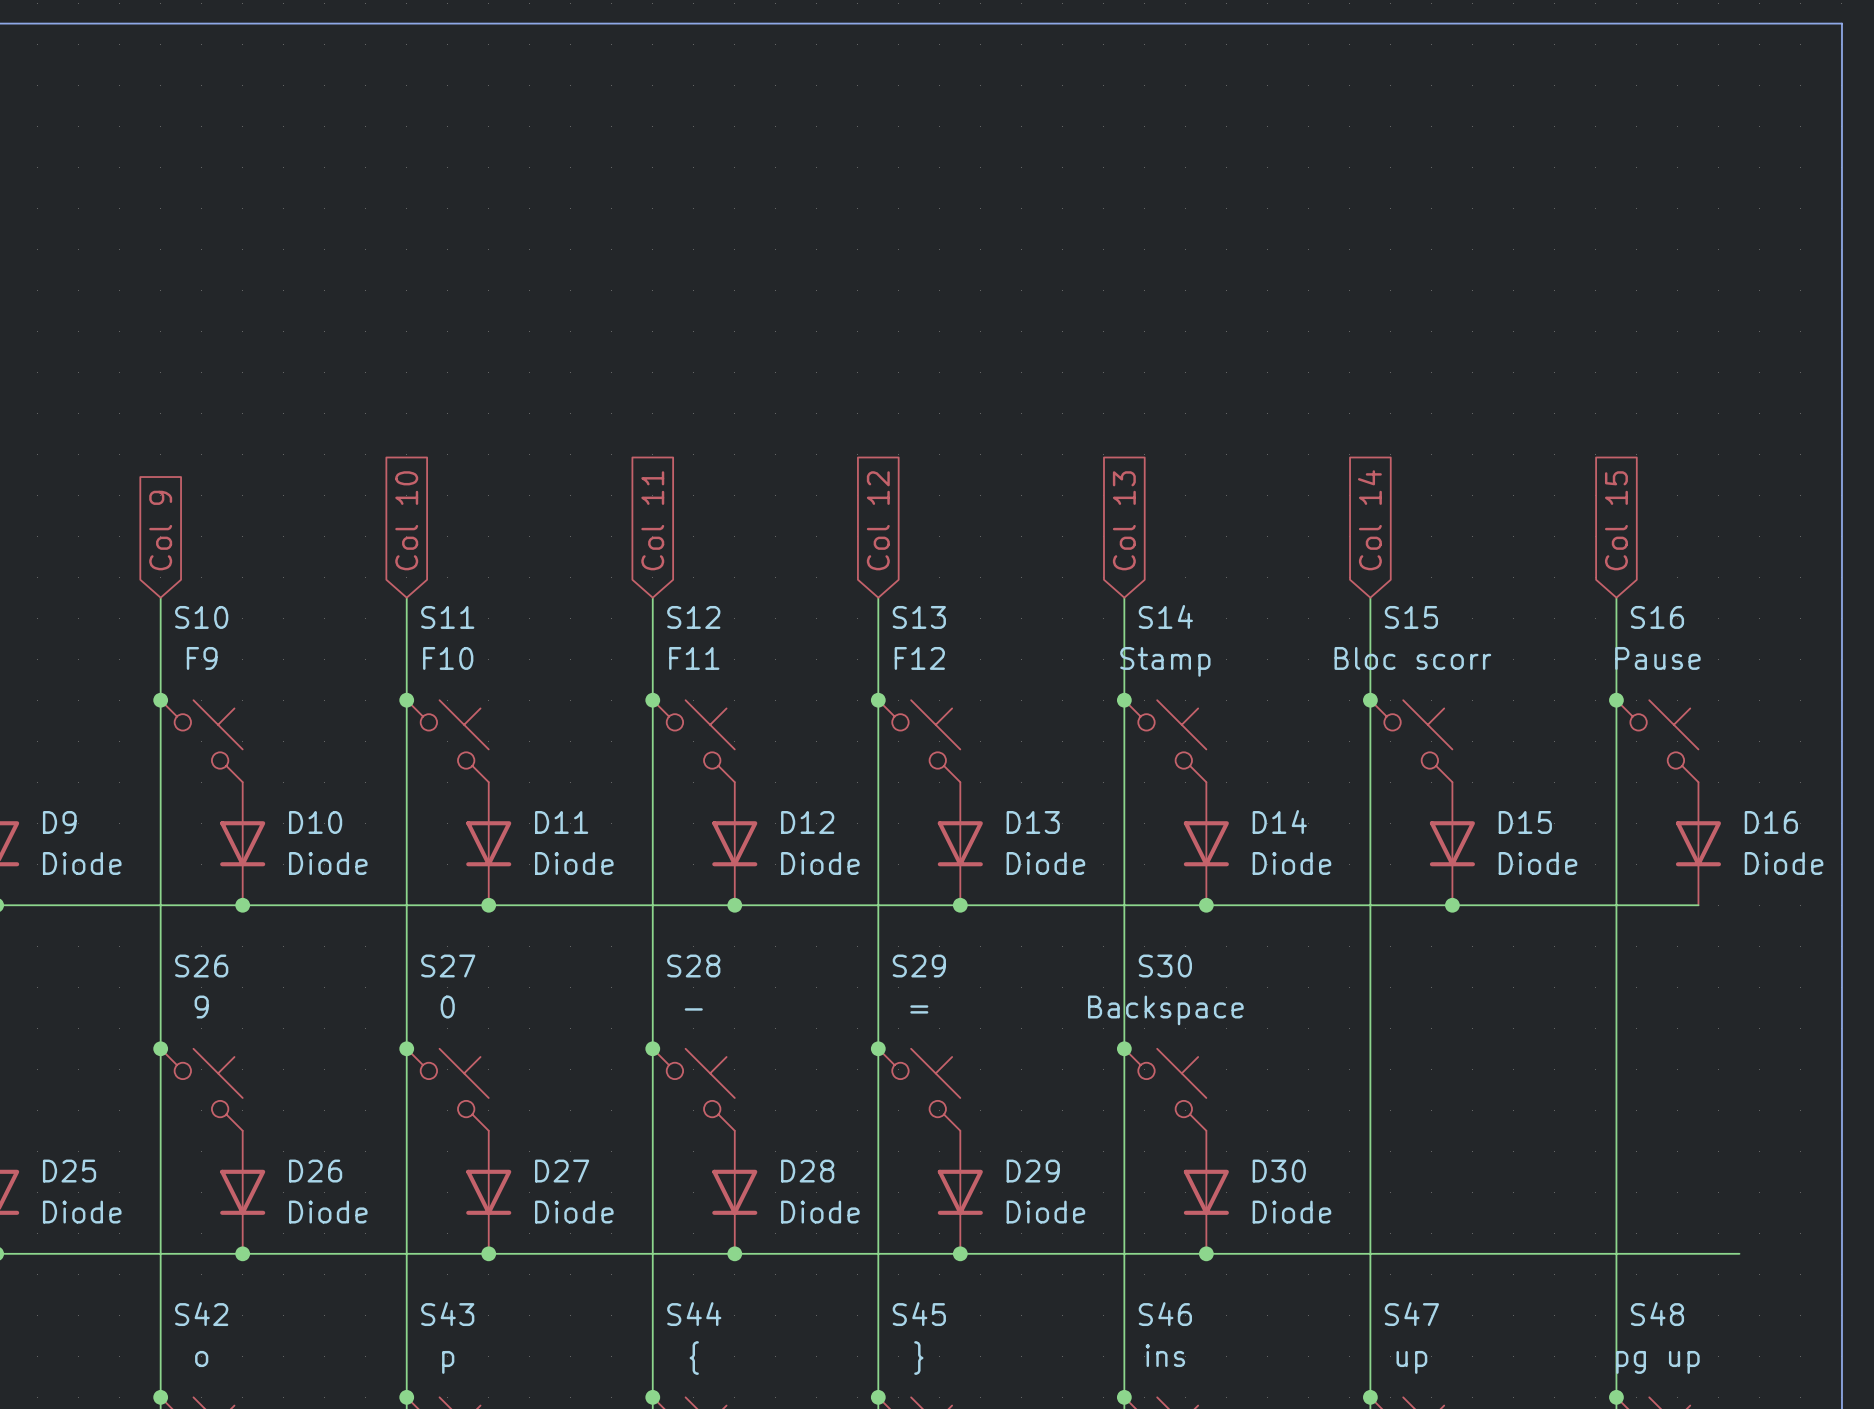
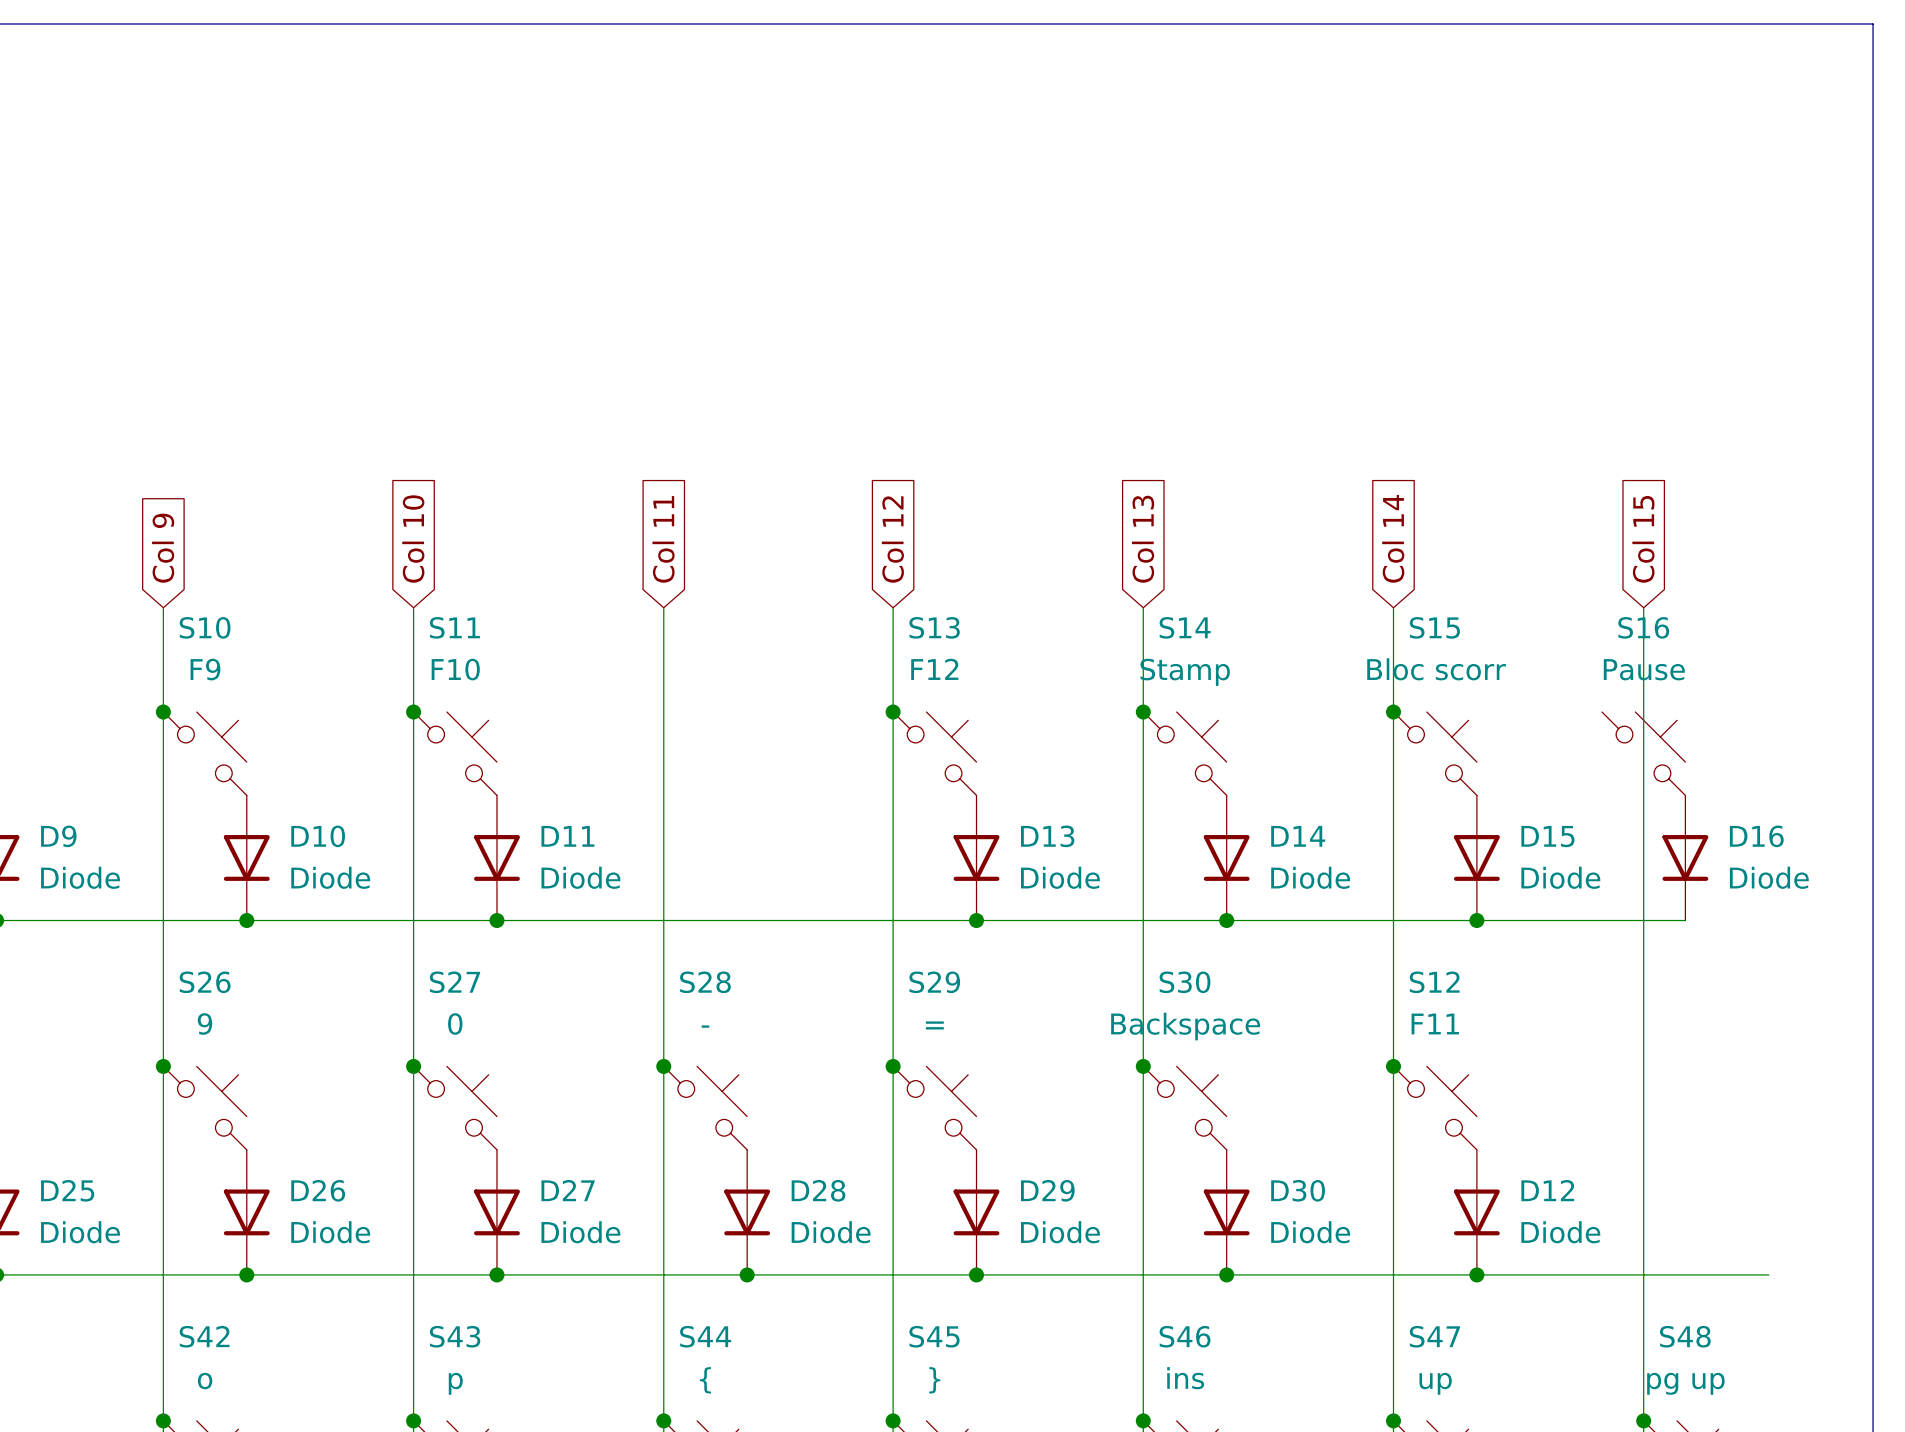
junction: (652, 700) -> none
junction: (1616, 700) -> none
S12 position: (693, 741) -> (1435, 1108)
S16 position: (1657, 741) -> (1643, 753)
D12 position: (734, 843) -> (1476, 1212)
D16 position: (1698, 843) -> (1685, 857)
junction: (734, 905) -> none
wire: (1657, 905) (1698, 905) -> none
junction: none -> (1393, 1066)
junction: none -> (1476, 1274)

